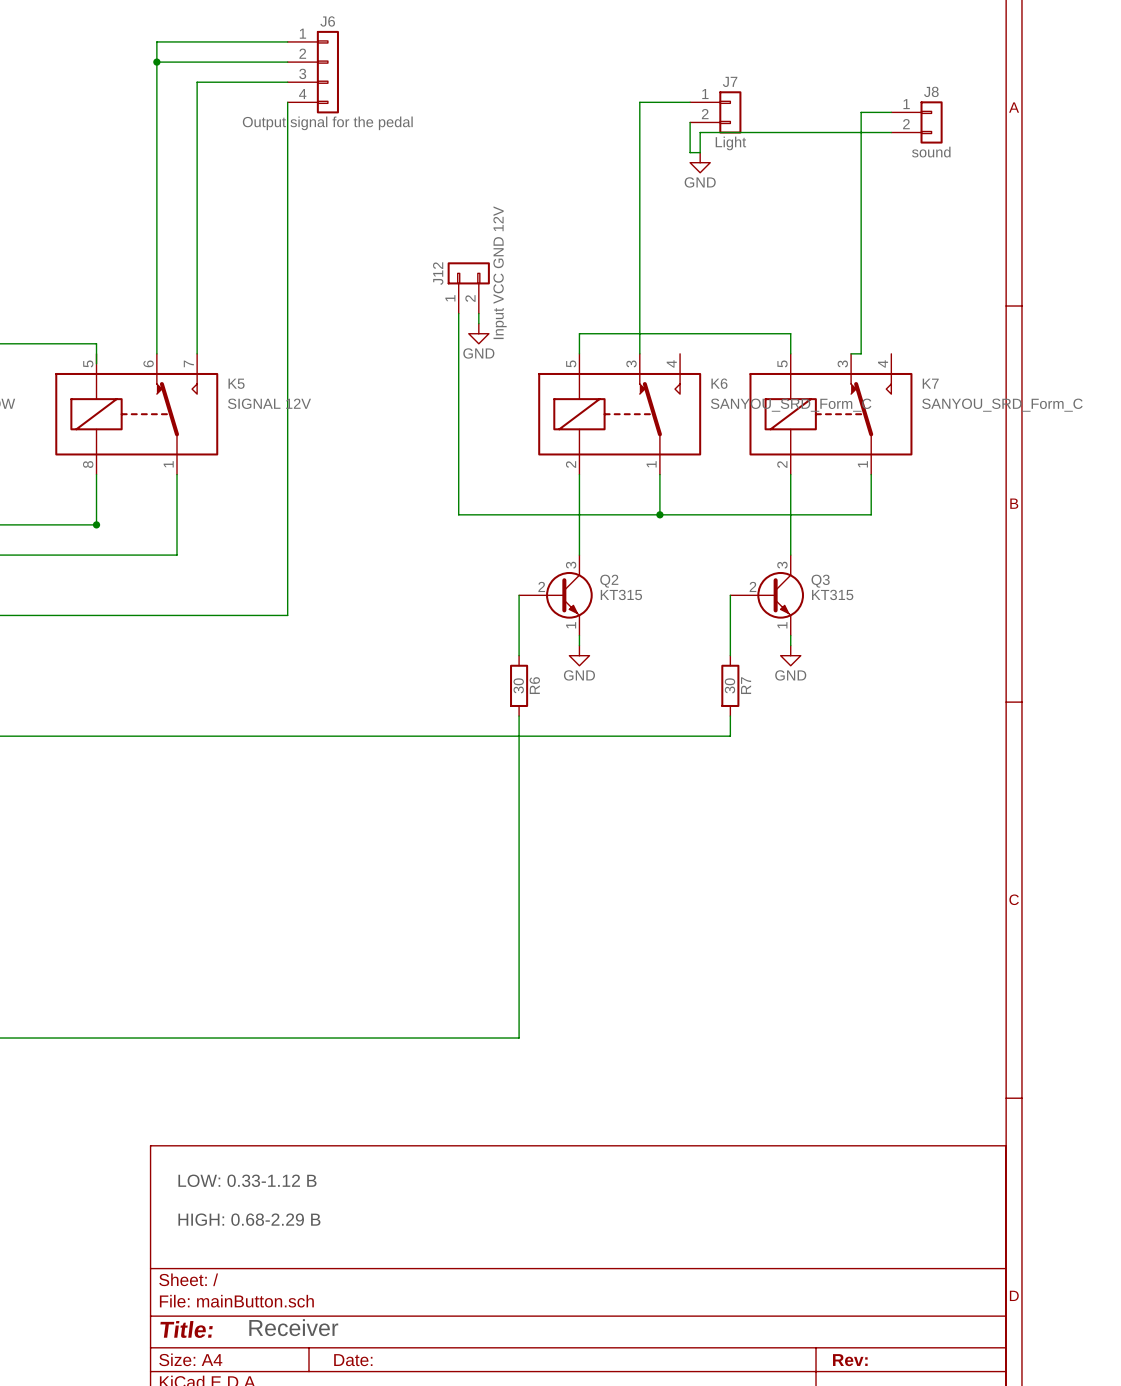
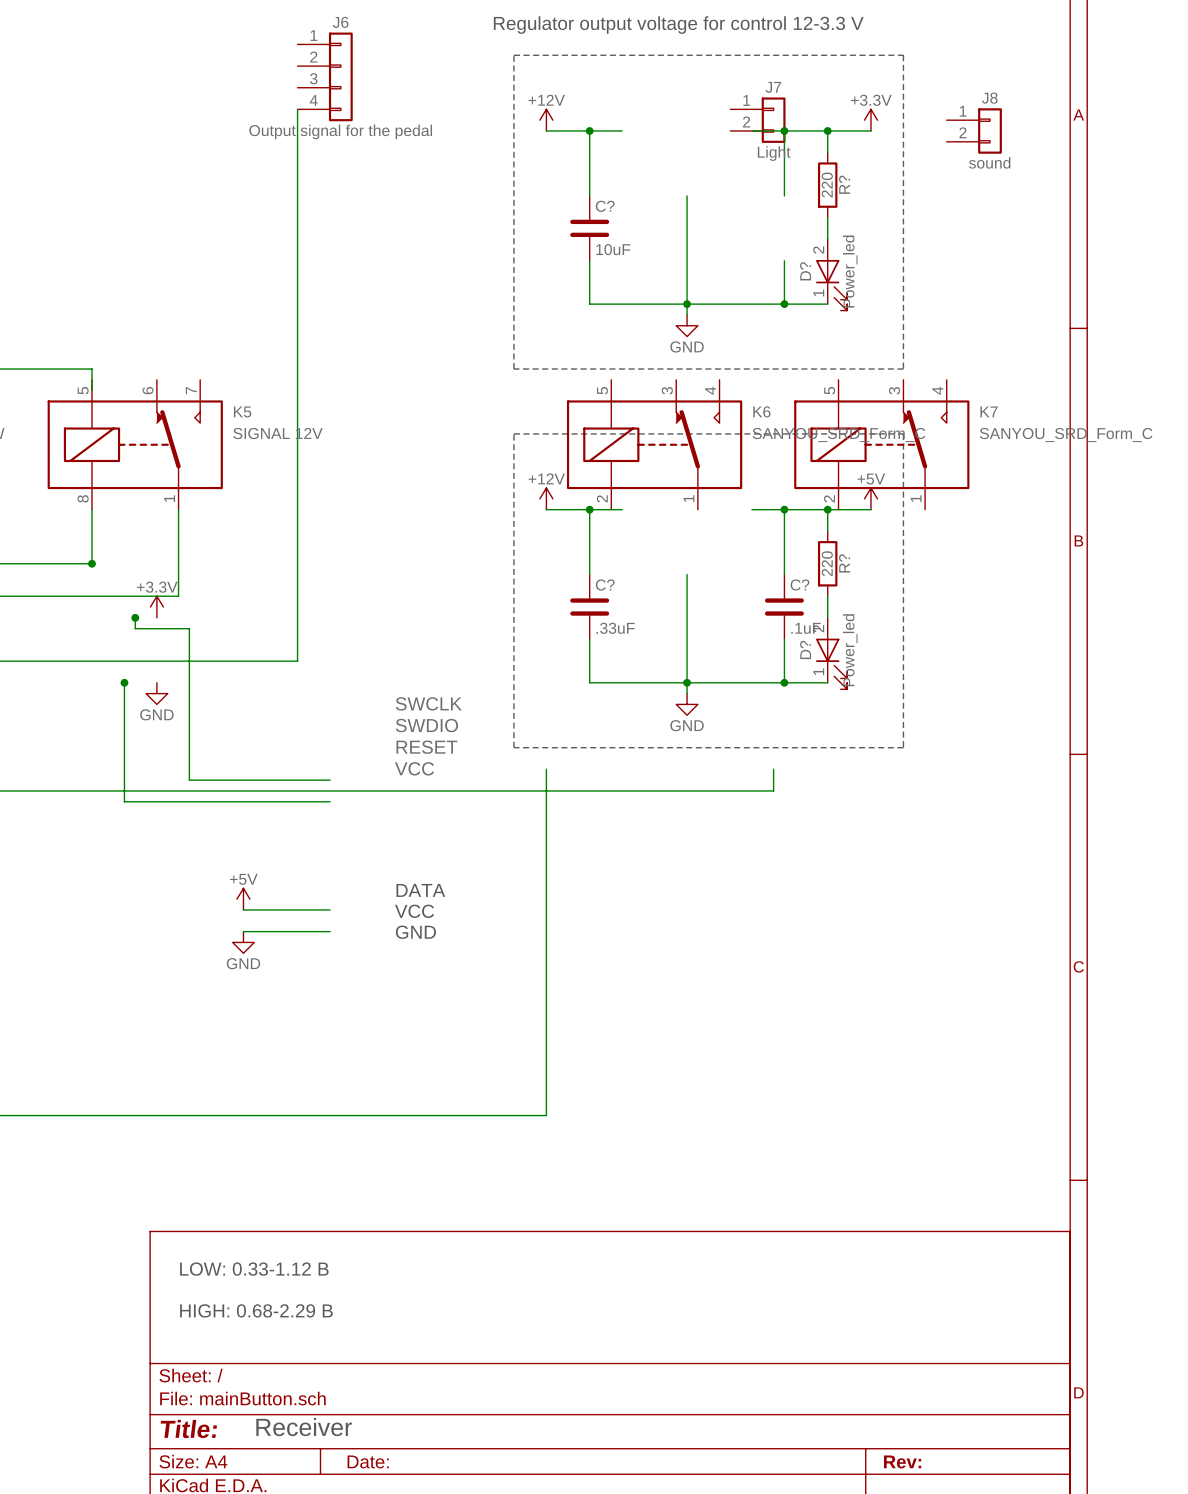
text: none -> Regulator output voltage for control 12-3.3 V (678, 25)
wire: (287, 41) (156, 41) (156, 353) -> none
line: none -> (513, 55) (903, 55) (903, 369) (513, 369) (513, 55)
wire: (156, 62) (287, 62) -> none
junction: (156, 62) -> none
wire: (287, 82) (197, 82) (197, 353) -> none
wire: (690, 102) (639, 102) (639, 353) -> none
power symbol: none -> +12V (546, 120)
power symbol: none -> +3.3V (870, 120)
wire: (891, 112) (861, 112) (861, 353) (851, 353) -> none
wire: none -> (546, 131) (622, 131)
wire: none -> (589, 131) (589, 195)
junction: none -> (589, 131)
wire: (690, 122) (690, 152) (700, 152) (700, 132) (891, 132) -> none
wire: none -> (751, 131) (870, 131)
wire: none -> (784, 131) (784, 195)
junction: none -> (784, 131)
wire: none -> (827, 131) (827, 152)
junction: none -> (827, 131)
power symbol: GND (700, 162) -> none
R?: none -> 220 (827, 185)
wire: none -> (687, 195) (687, 314)
wire: none -> (827, 217) (827, 239)
C?: none -> 10uF (589, 228)
wire: none -> (589, 260) (589, 304) (827, 304)
wire: none -> (784, 260) (784, 304)
D?: none -> Power_led (831, 274)
junction: none -> (687, 304)
junction: none -> (784, 304)
J12: Input VCC GND 12V (468, 287) -> none
power symbol: none -> GND (687, 325)
wire: (458, 313) (458, 514) (871, 514) (871, 474) -> none
wire: (478, 313) (478, 323) -> none
power symbol: GND (478, 333) -> none
wire: (579, 353) (579, 333) (790, 333) (790, 353) -> none
line: none -> (513, 433) (513, 747) (903, 747) (903, 433) (513, 433)
power symbol: none -> +12V (546, 498)
power symbol: none -> +5V (870, 498)
wire: none -> (546, 509) (622, 509)
junction: none -> (589, 509)
wire: (579, 474) (579, 555) -> none
wire: (659, 474) (659, 514) -> (784, 639) (784, 682)
wire: none -> (751, 509) (870, 509)
junction: none -> (784, 509)
wire: none -> (827, 509) (827, 531)
junction: none -> (827, 509)
wire: (790, 474) (790, 555) -> none
junction: (659, 514) -> none
R?: none -> 220 (827, 563)
wire: none -> (687, 574) (687, 693)
wire: none -> (827, 596) (827, 617)
power symbol: none -> +3.3V (156, 607)
C?: none -> .33uF (589, 607)
C?: none -> .1uF (784, 607)
wire: none -> (135, 617) (135, 628) (189, 628) (189, 780) (330, 780)
junction: none -> (135, 617)
wire: (519, 595) (519, 655) -> (589, 509) (589, 574)
Q2: KT315 (555, 595) -> none
wire: none -> (589, 639) (589, 682) (827, 682)
wire: (730, 595) (730, 655) -> (784, 509) (784, 574)
Q3: KT315 (767, 595) -> none
D?: none -> Power_led (831, 653)
wire: none -> (124, 682) (124, 801) (330, 801)
junction: none -> (124, 682)
wire: (579, 635) (579, 645) -> none
junction: none -> (687, 682)
junction: none -> (784, 682)
wire: (790, 635) (790, 645) -> none
power symbol: none -> GND (156, 693)
label: none -> SWCLK (428, 703)
power symbol: GND (579, 655) -> none
power symbol: none -> GND (687, 704)
power symbol: GND (790, 655) -> none
label: none -> SWDIO (426, 725)
R6: 30 (519, 685) -> none
R7: 30 (730, 685) -> none
label: none -> RESET (426, 747)
label: none -> VCC (414, 768)
text: none -> DATA (420, 890)
power symbol: none -> +5V (243, 899)
wire: none -> (243, 909) (330, 909)
text: none -> VCC (414, 911)
wire: none -> (243, 931) (330, 931)
text: none -> GND (415, 932)
power symbol: none -> GND (243, 942)

